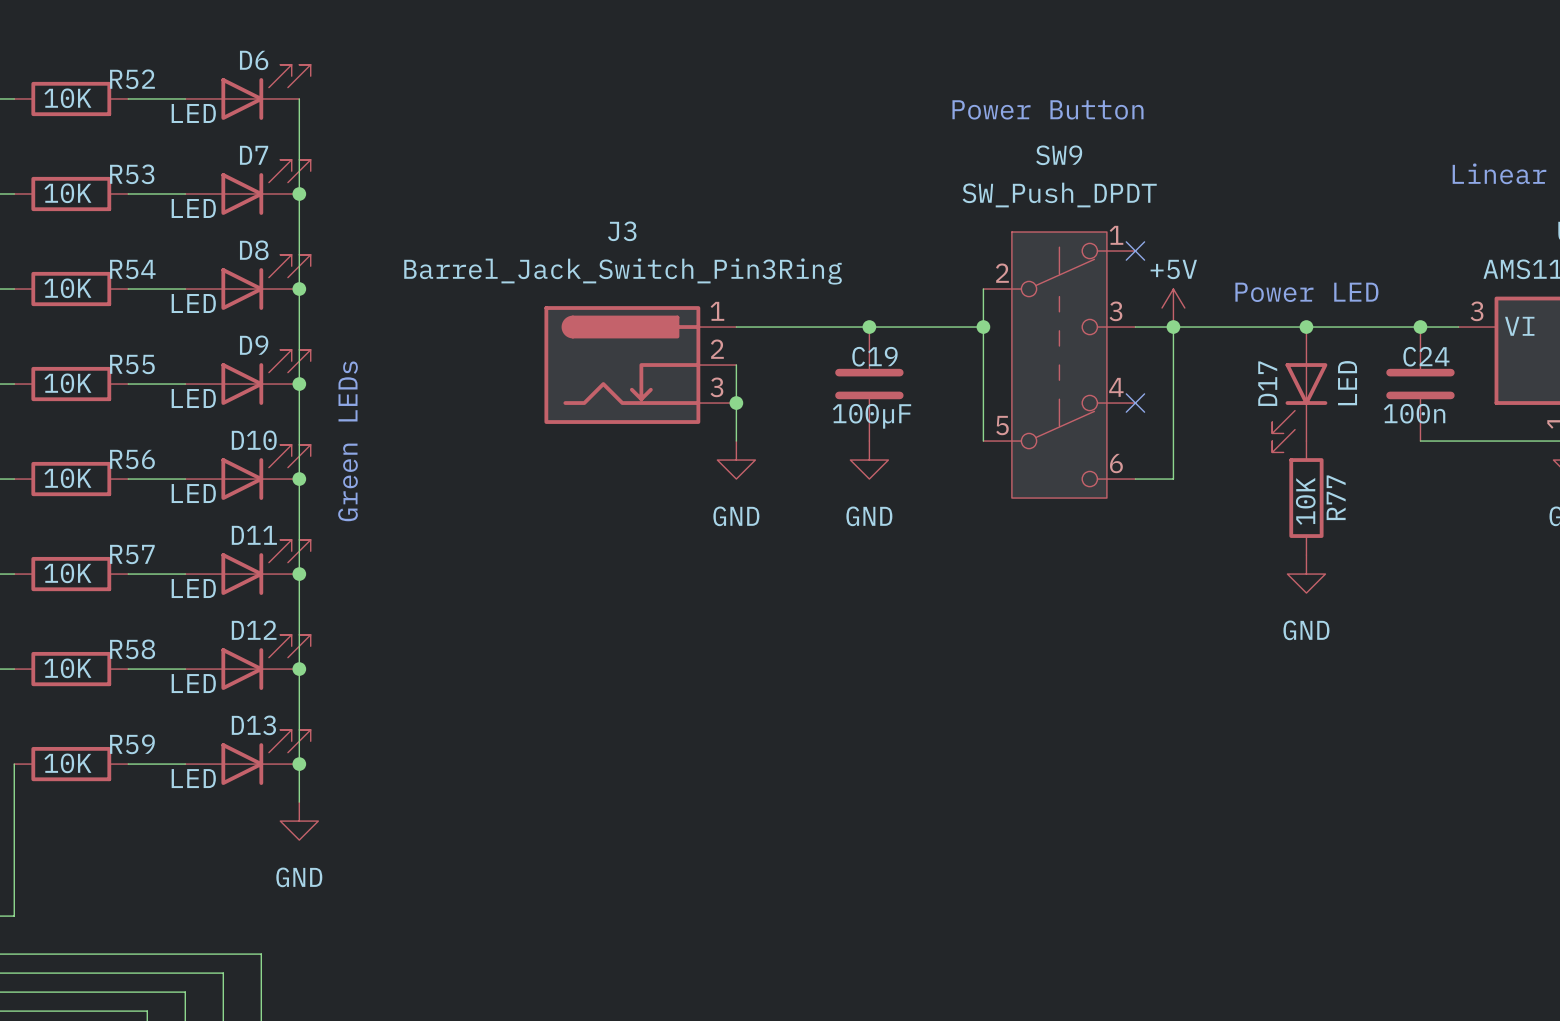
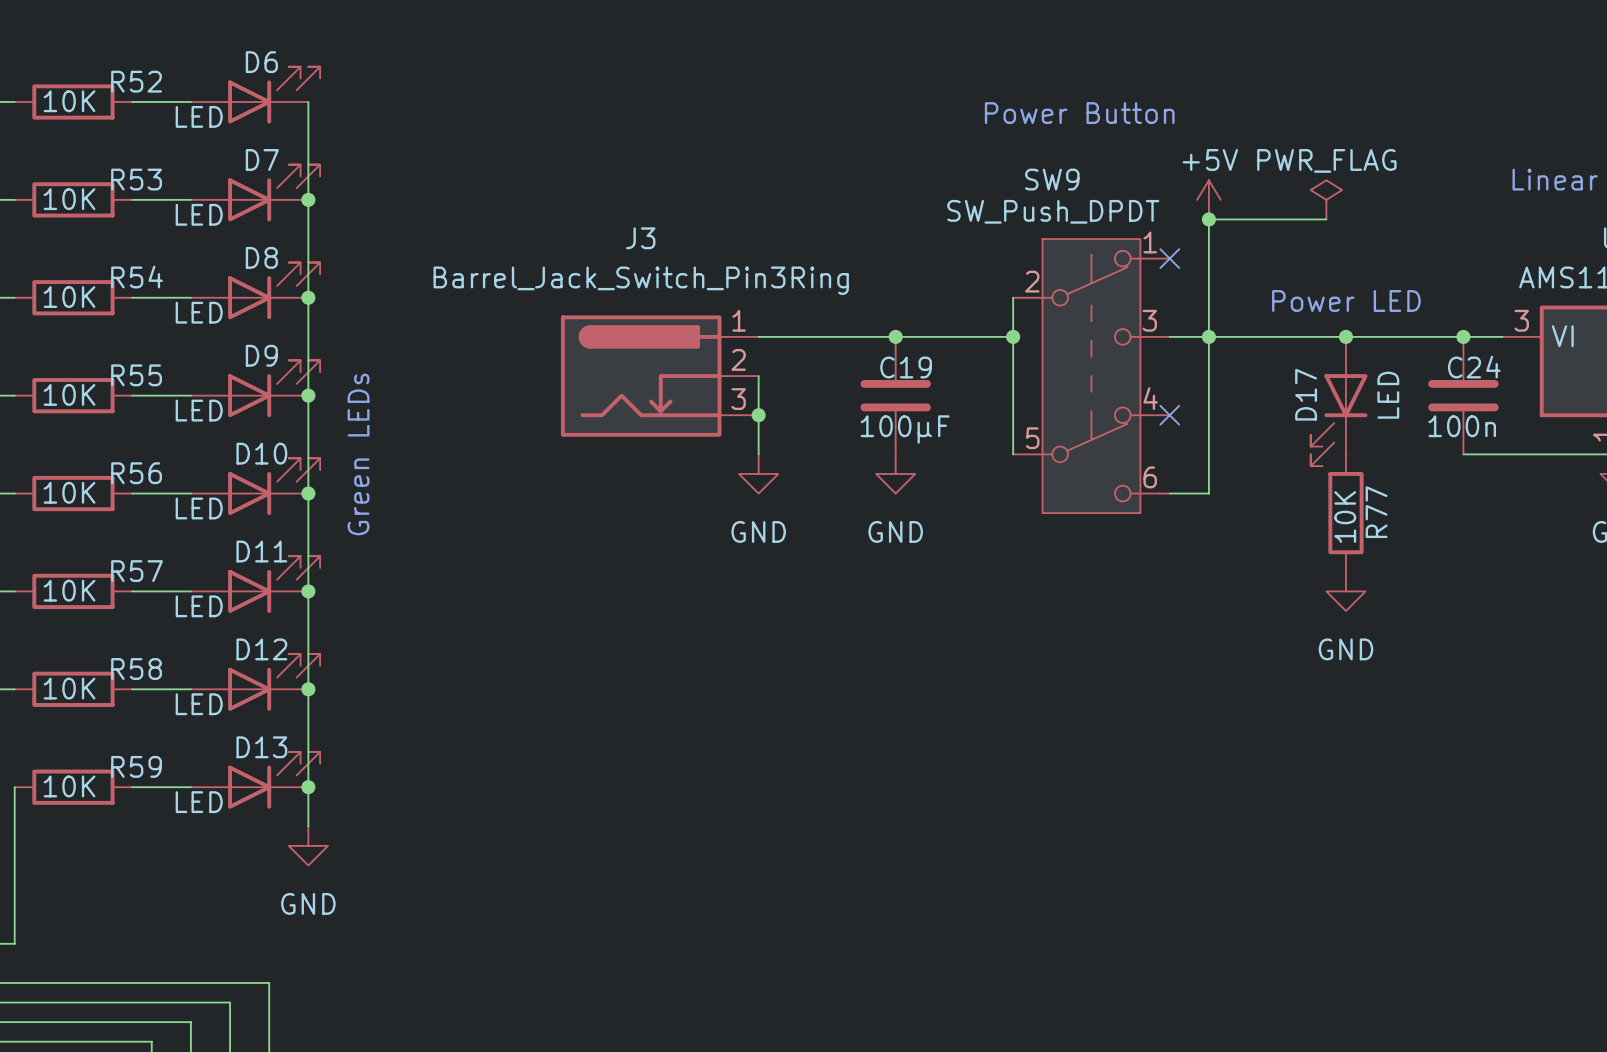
SW9 name position: SW9 (1059, 155) -> SW9 (1052, 179)
power symbol: none -> PWR_FLAG (1326, 199)
SW9 value position: SW_Push_DPDT (1059, 195) -> SW_Push_DPDT (1053, 211)
junction: none -> (1208, 219)
wire: none -> (1326, 219) (1208, 219) (1208, 336)
power symbol position: +5V (1173, 308) -> +5V (1208, 199)

